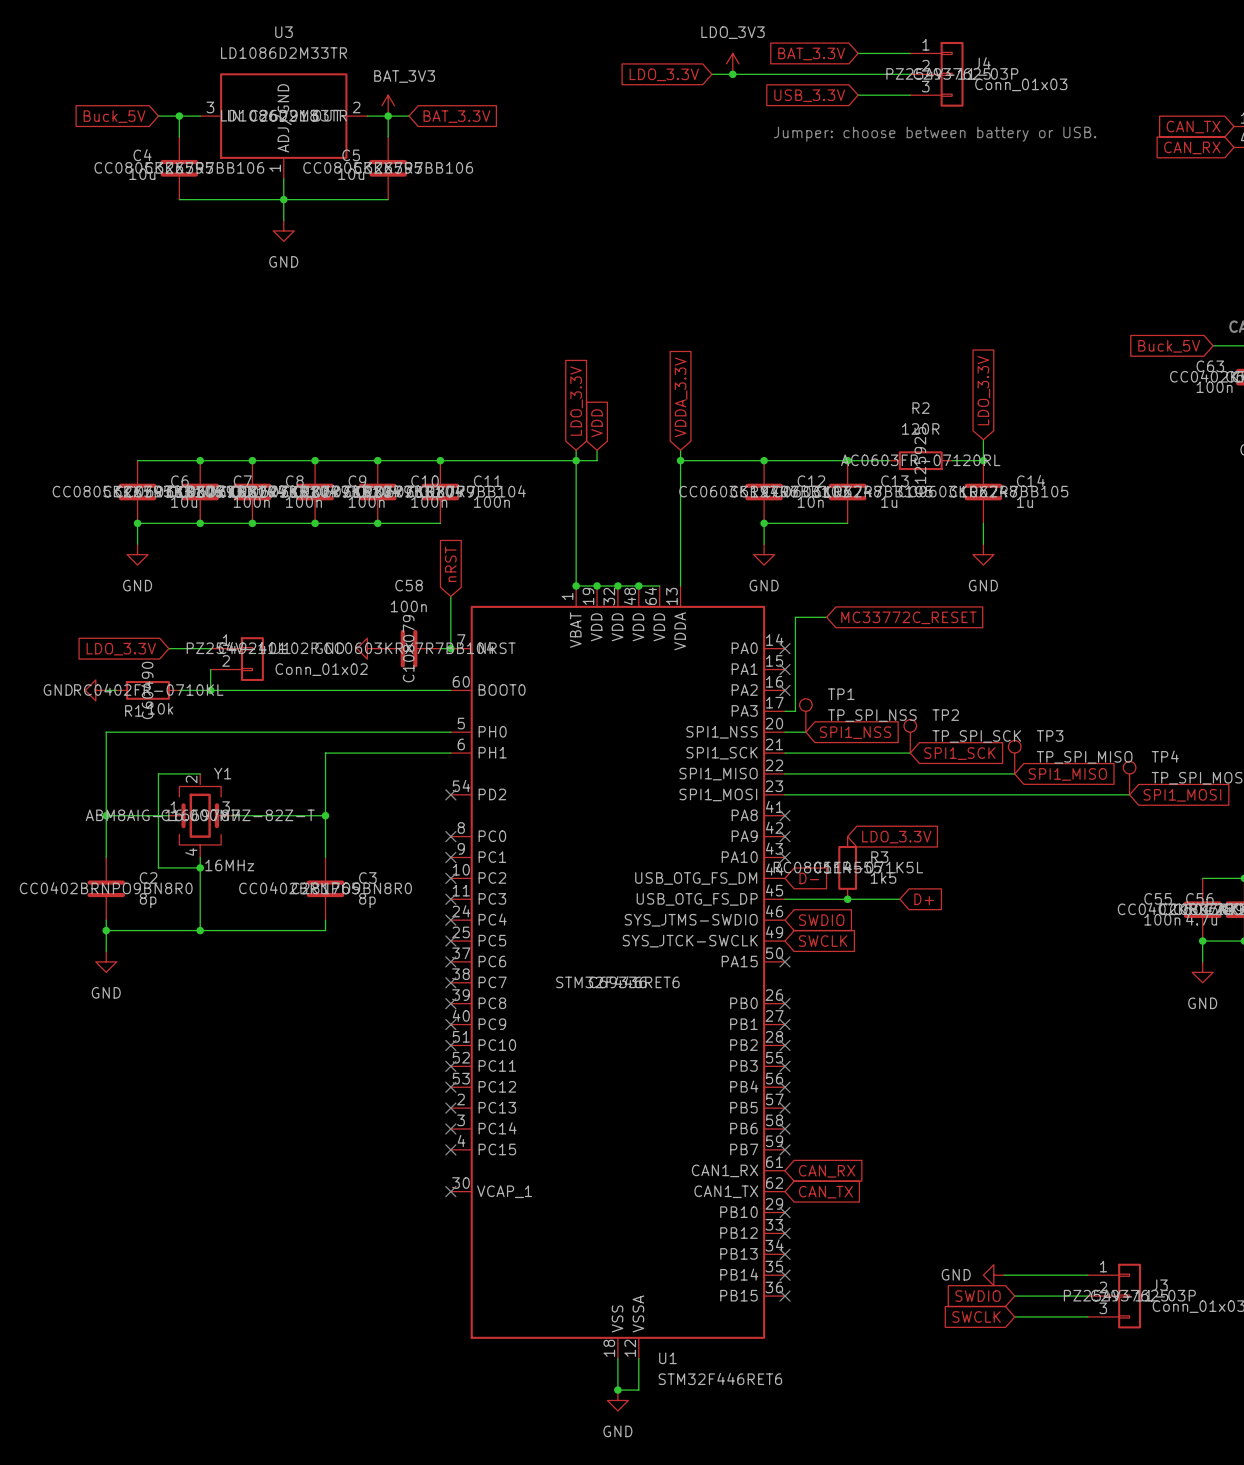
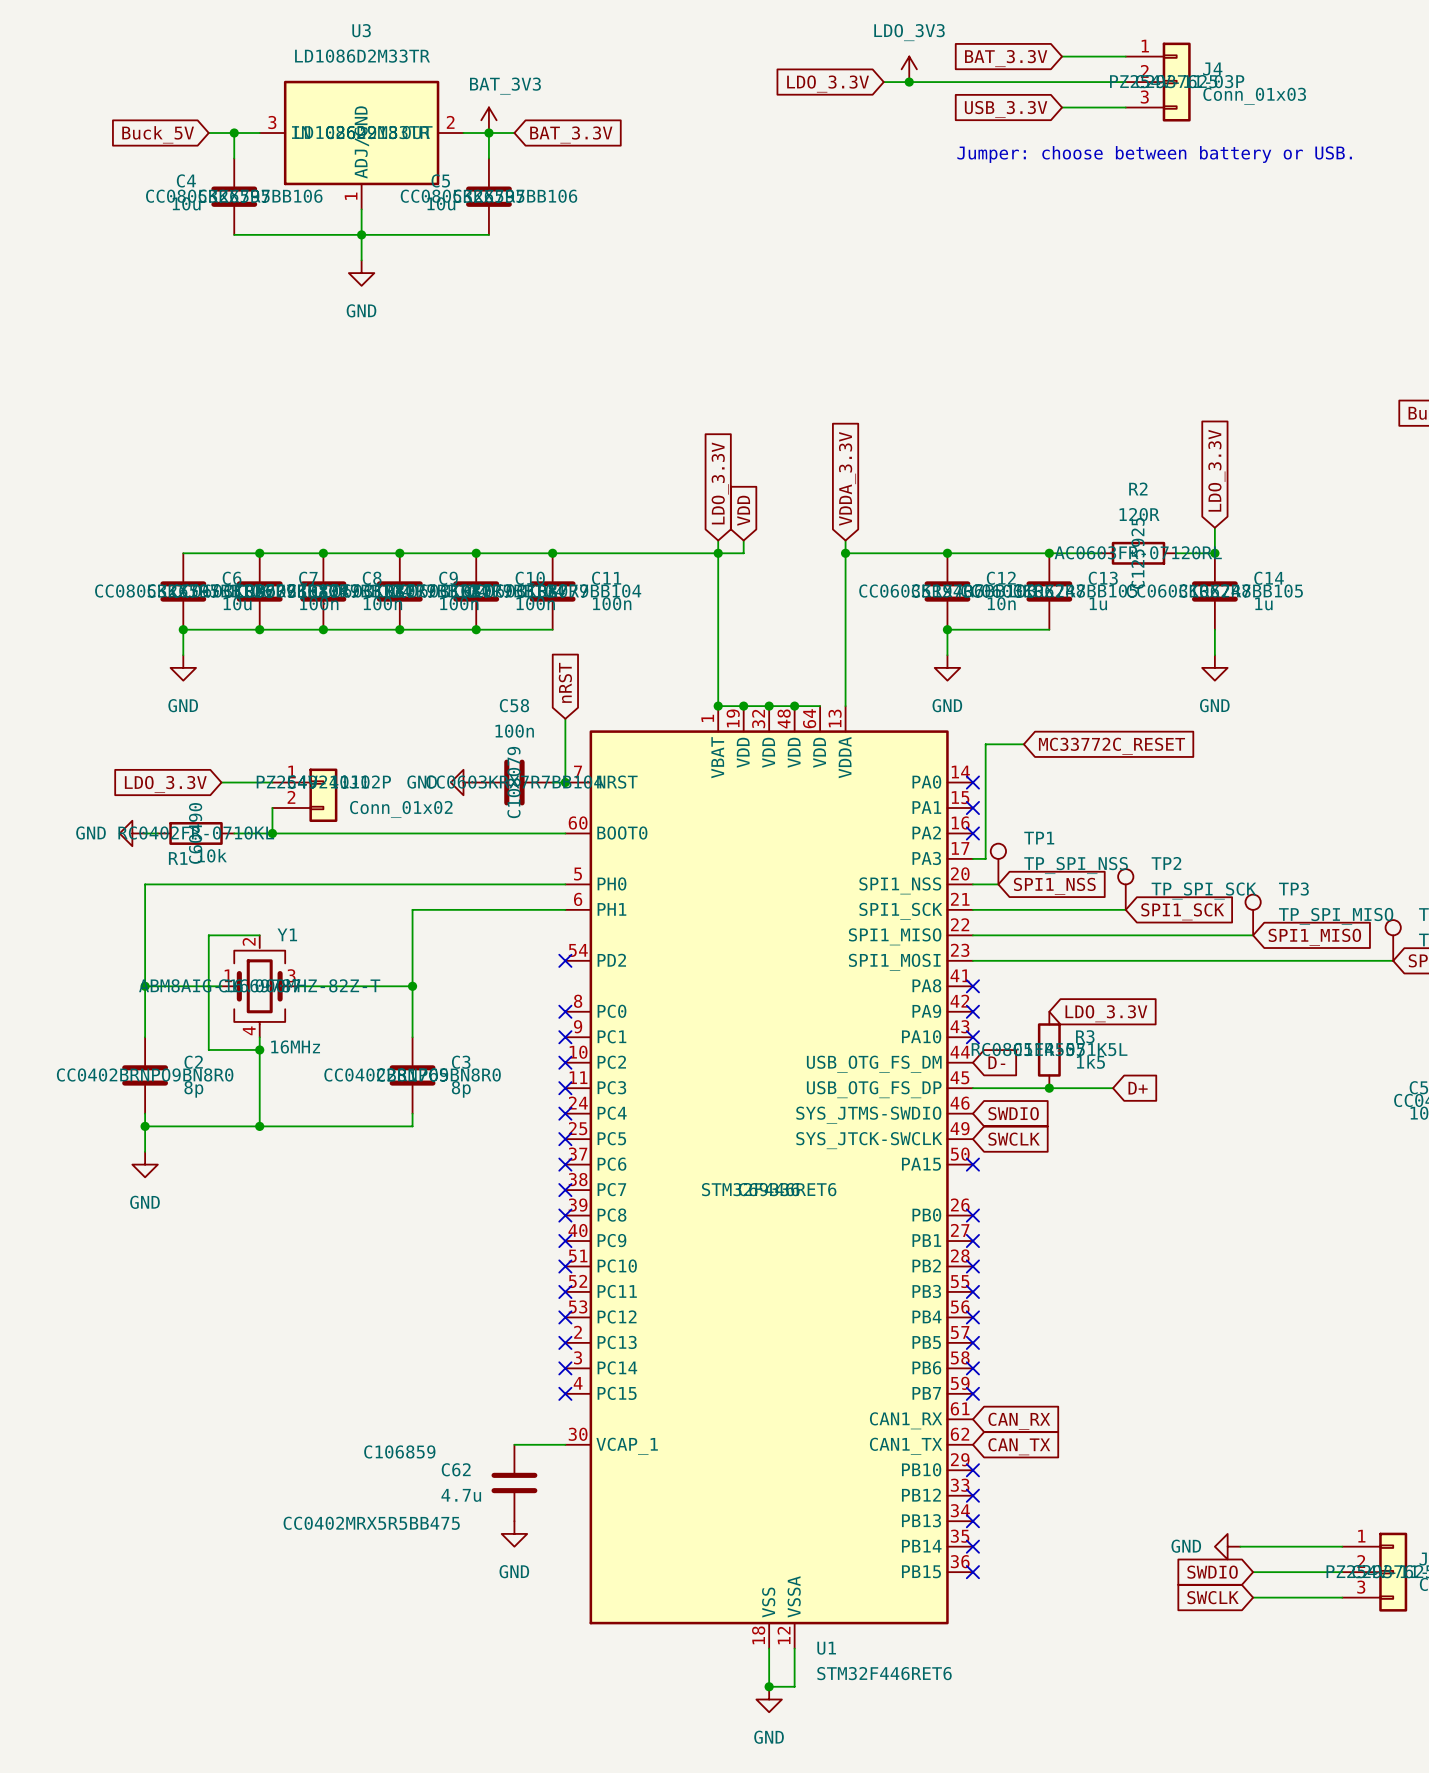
wire: none -> (514, 1444) (565, 1444)
no-connect mark: (450, 1191) -> none
C62: none -> 4.7u (514, 1483)
power symbol: none -> GND (514, 1533)

